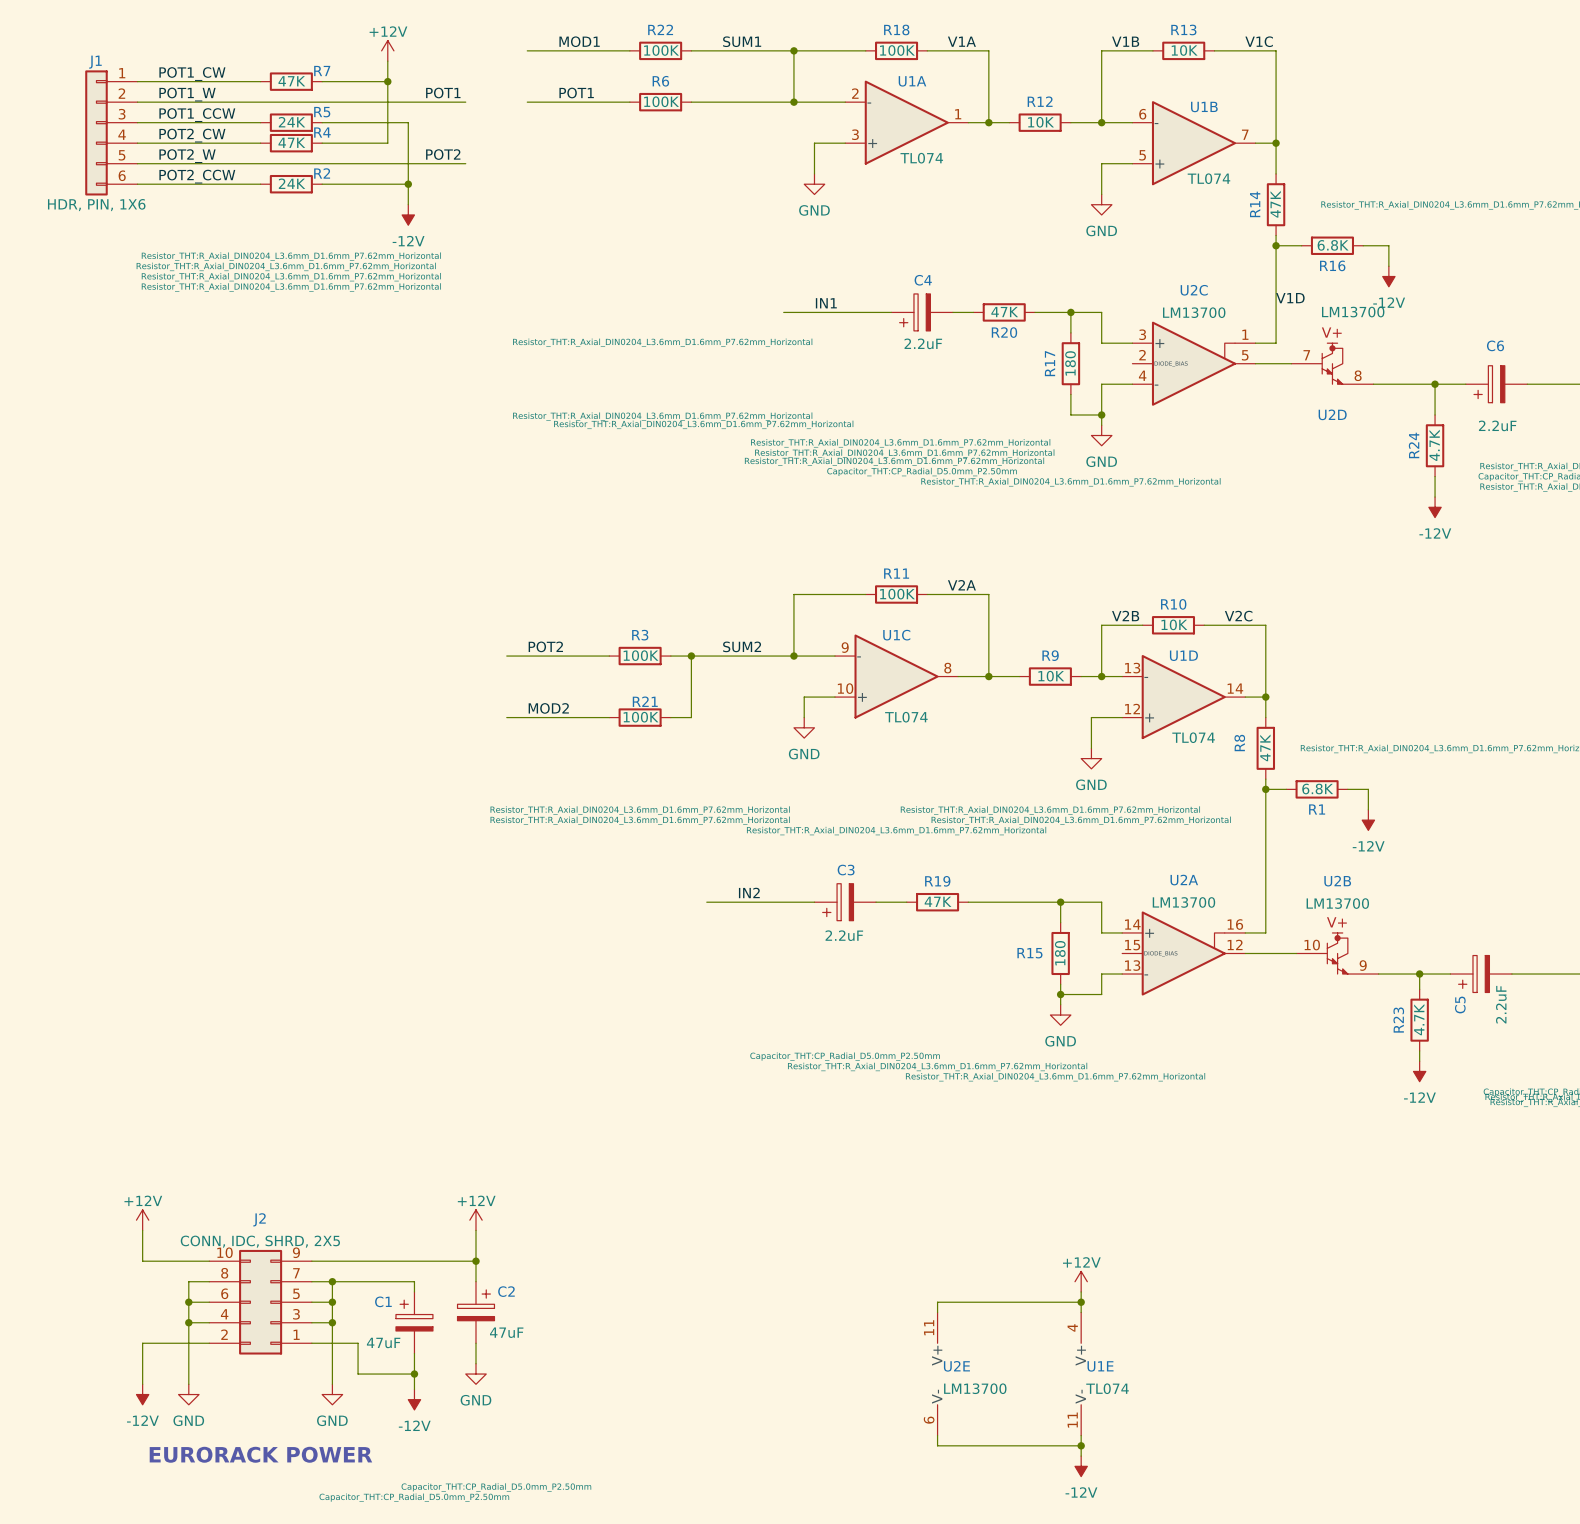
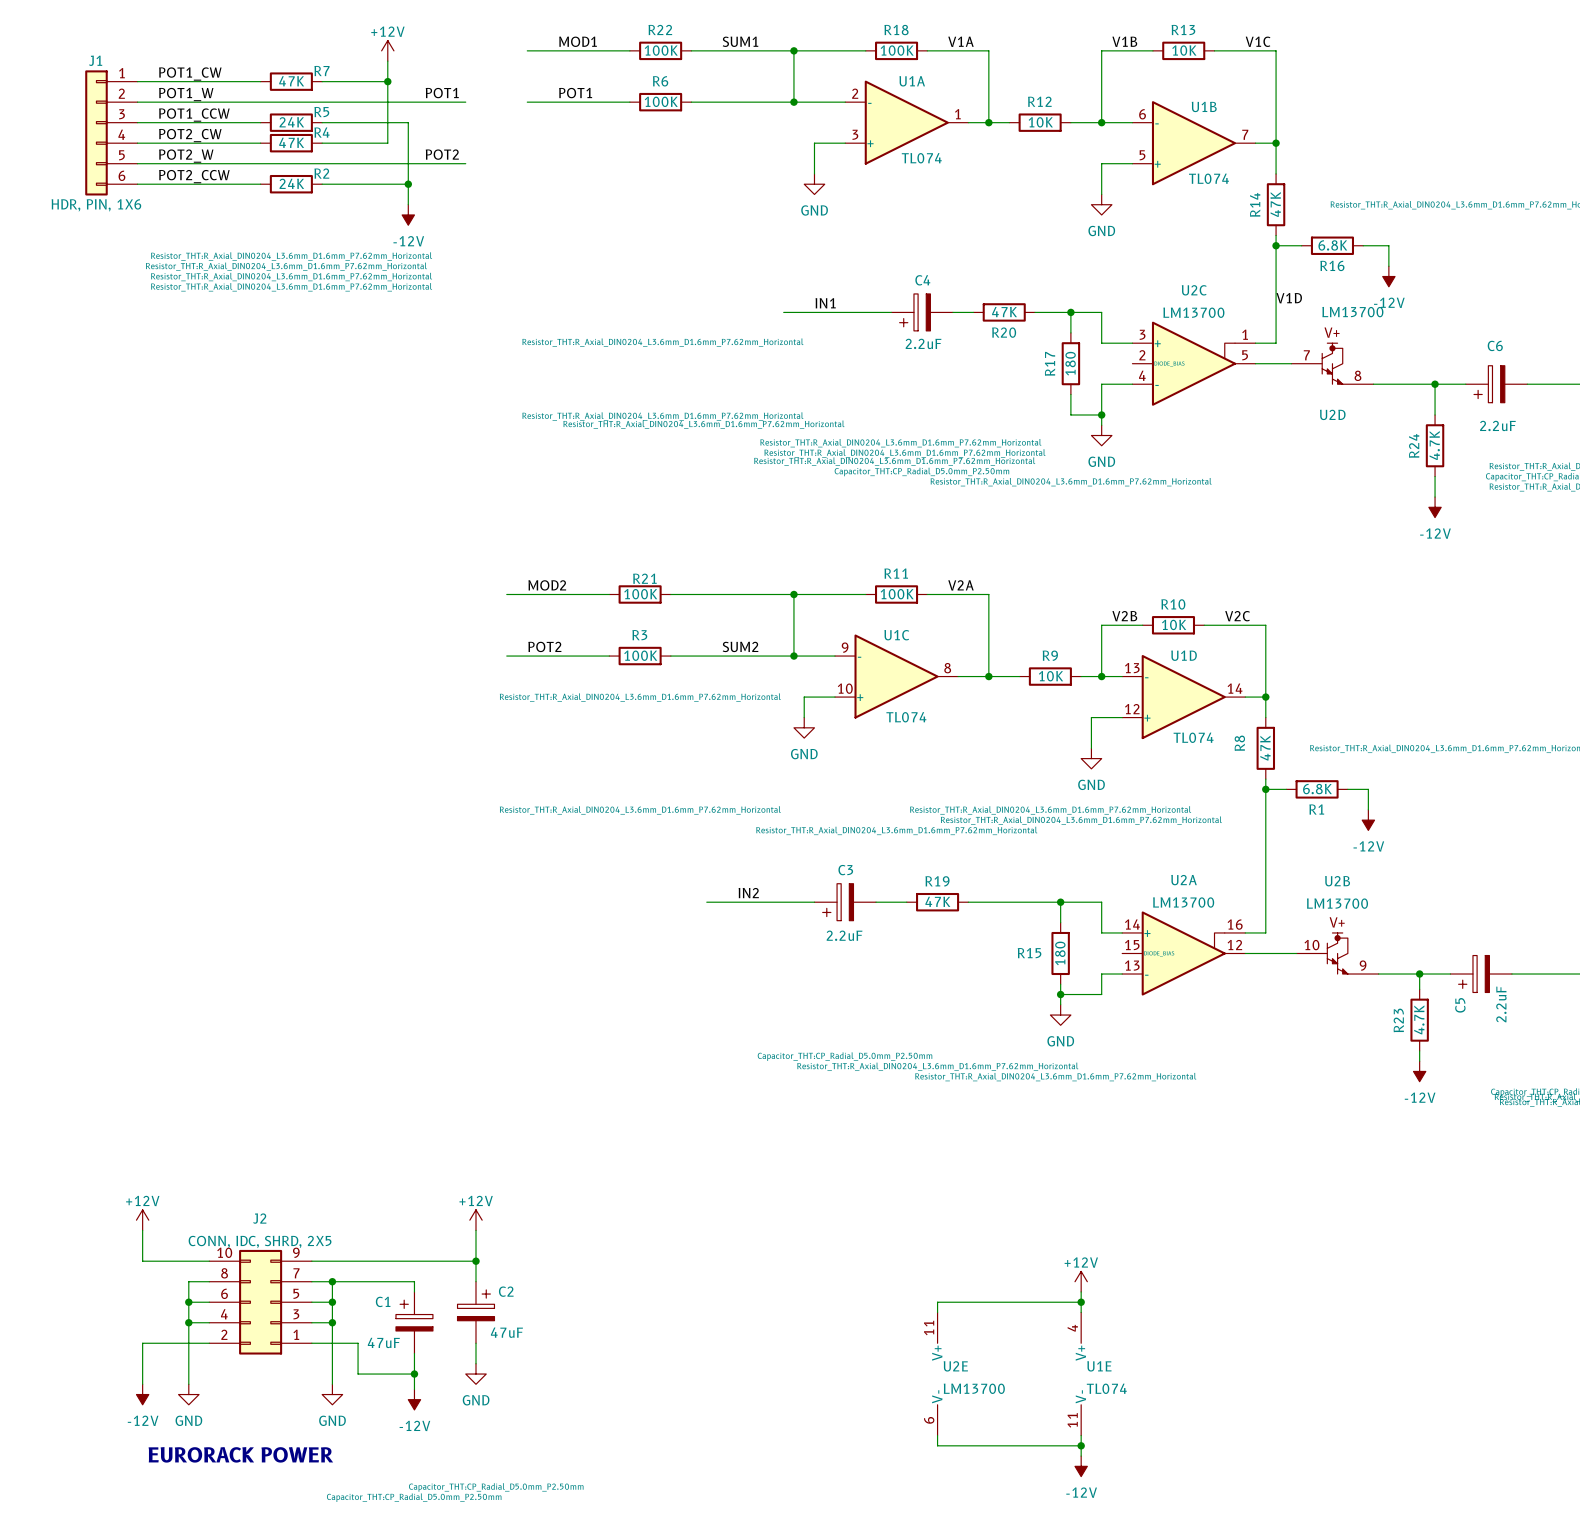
wire: none -> (670, 594) (793, 594)
junction: none -> (793, 594)
wire: (691, 656) (691, 717) (670, 717) -> none
junction: (691, 656) -> none
label position: MOD2 (548, 708) -> MOD2 (547, 585)
wire: (506, 717) (609, 717) -> (506, 594) (609, 594)
R21 position: (640, 717) -> (640, 594)

